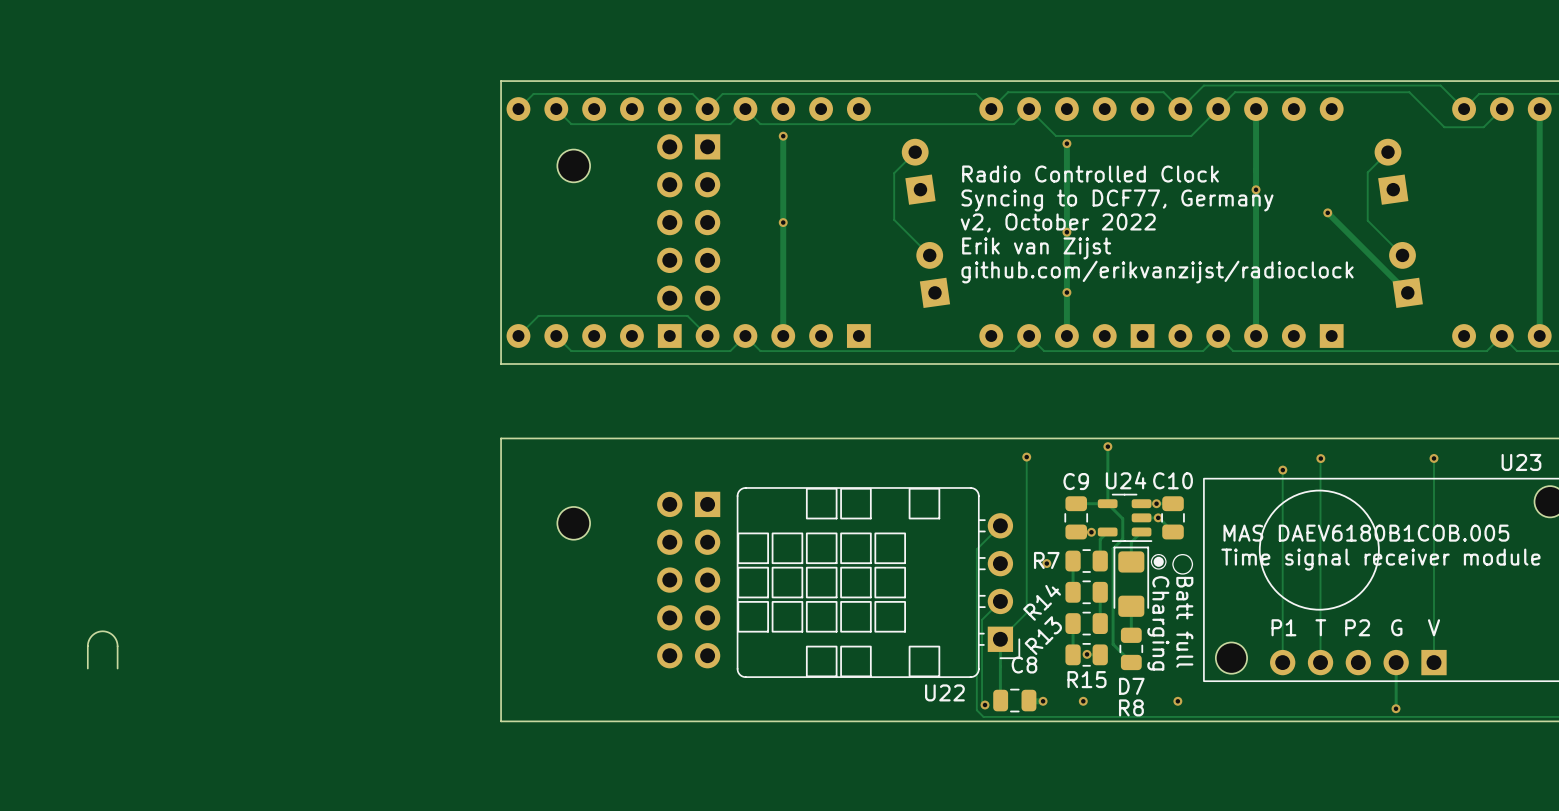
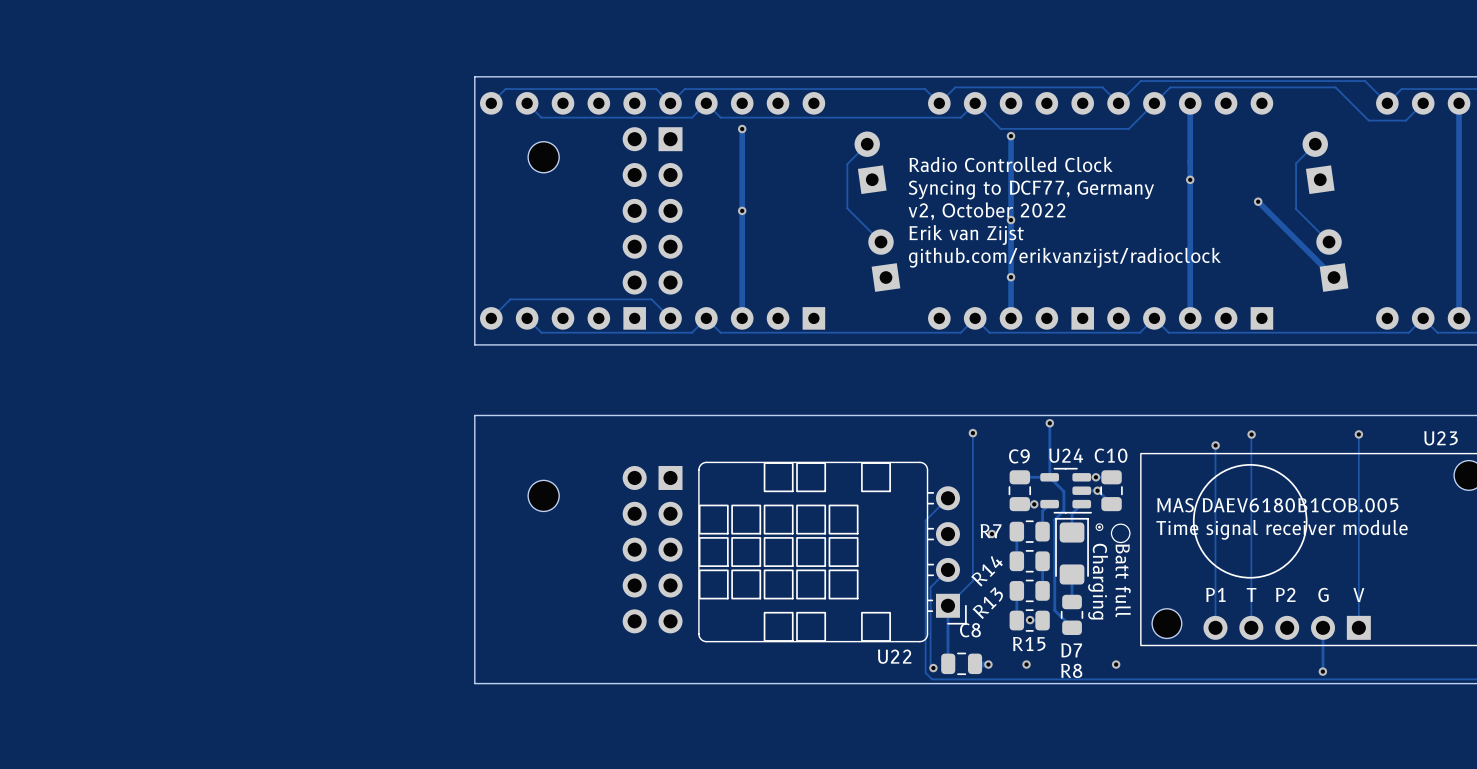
board edge: (117, 668) (116, 640) (111, 634) (102, 631) (93, 634) (88, 640) (87, 668) -> none

